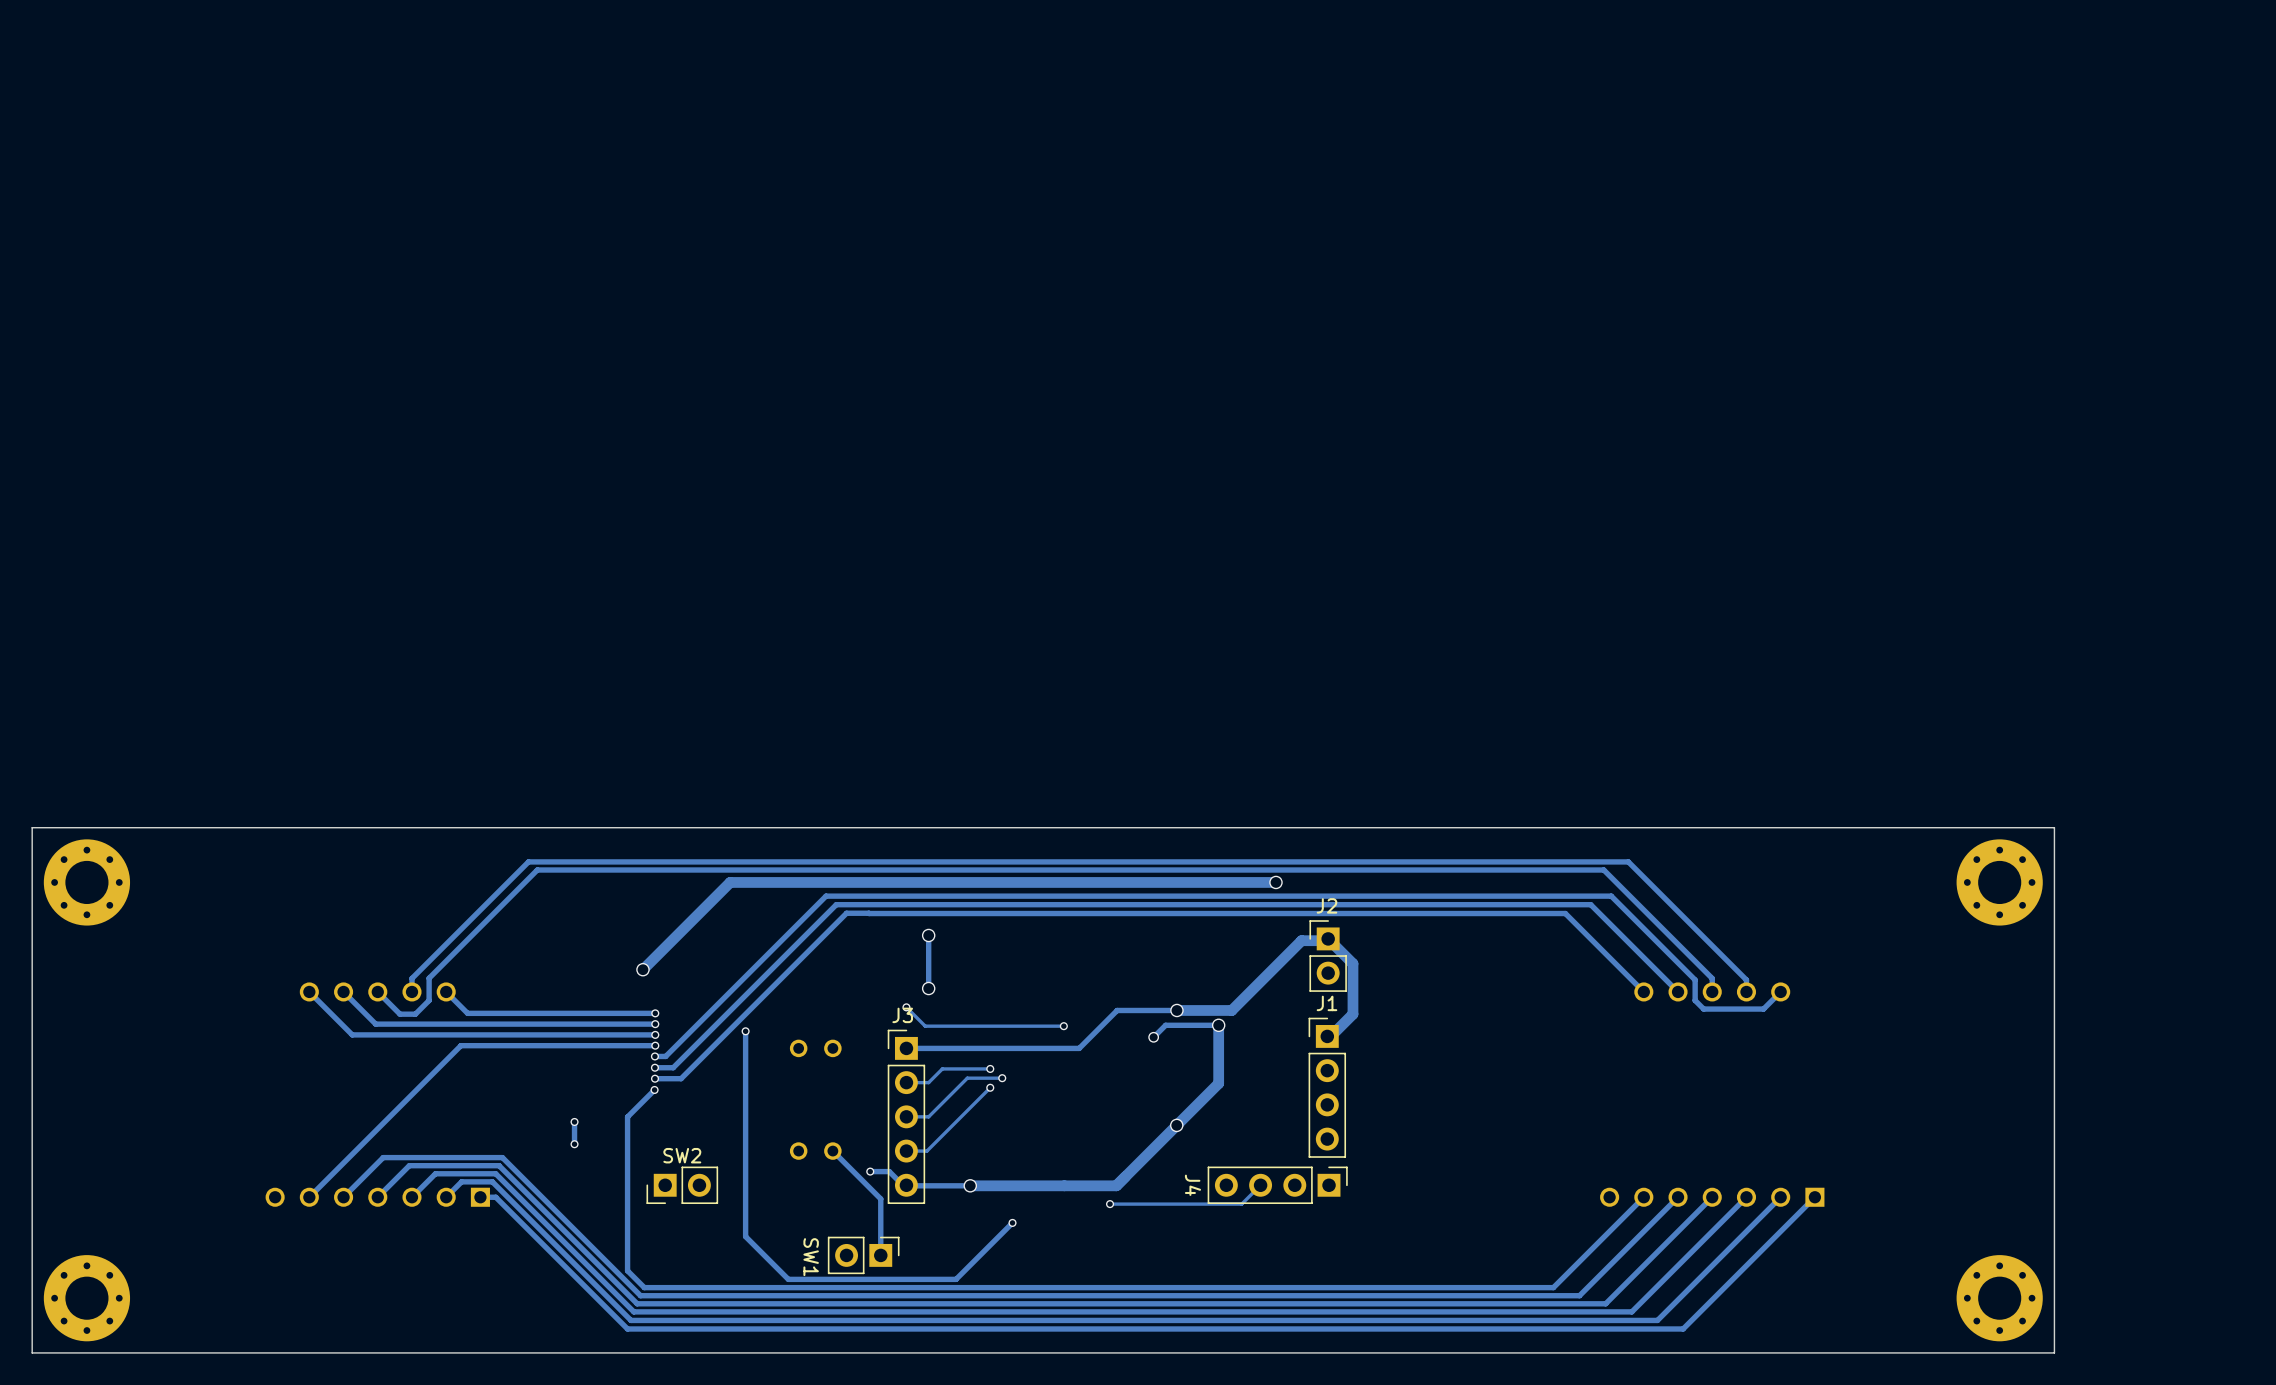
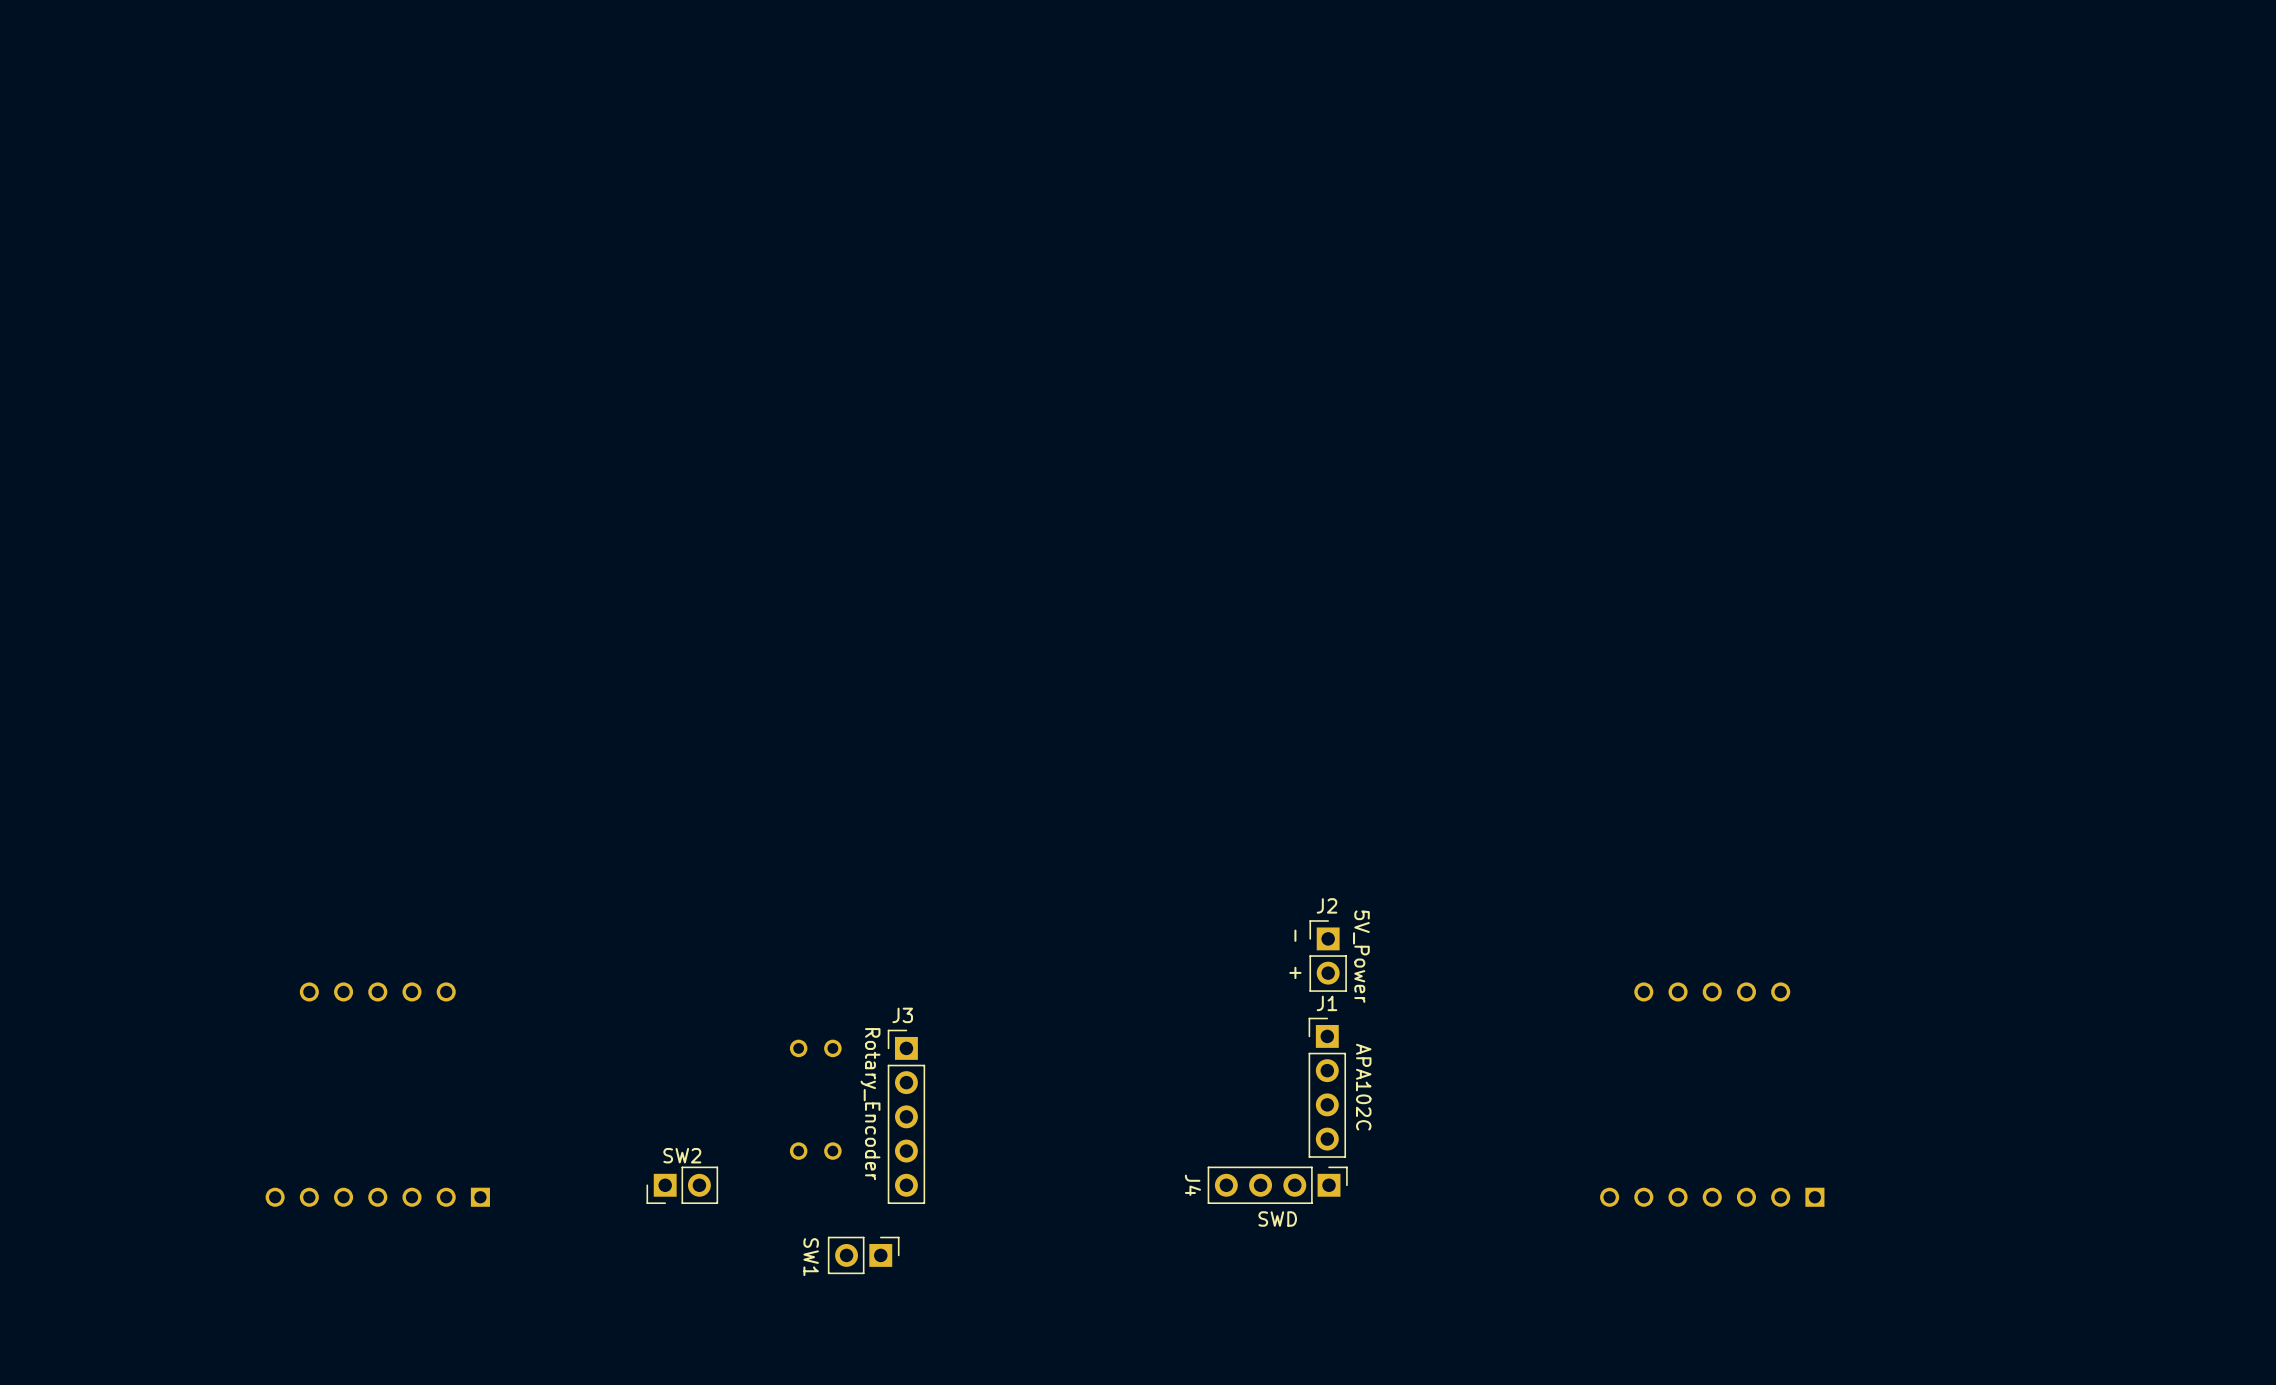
board edge: (2054, 827) (32, 827) (32, 1352) (2054, 1352) (2054, 827) -> none
part: (86, 882) -> none
track: (1275, 882) (730, 882) (642, 969) -> none
via: (1275, 882) -> none
part: (1999, 882) -> none
track: (928, 935) (928, 988) -> none
via: (928, 935) -> none
J2 text: none -> - + (1295, 954)
J2 value: none -> 5V_Power (1361, 956)
via: (642, 969) -> none
via: (928, 988) -> none
track: (309, 991) (352, 1034) (655, 1034) -> none
track: (343, 991) (375, 1024) (655, 1024) -> none
track: (446, 991) (467, 1013) (655, 1013) -> none
track: (1643, 991) (1565, 913) (846, 913) (681, 1078) (655, 1078) -> none
track: (1678, 991) (1590, 904) (836, 904) (673, 1067) (654, 1067) -> none
track: (1712, 991) (1712, 978) (1603, 870) (537, 870) (429, 978) (429, 1000) (415, 1014) (400, 1014) (377, 991) -> none
track: (1746, 991) (1746, 979) (1628, 861) (528, 861) (412, 978) (412, 991) -> none
track: (1780, 991) (1763, 1009) (1703, 1009) (1695, 1000) (1695, 979) (1611, 896) (826, 896) (665, 1056) (654, 1056) -> none
track: (906, 1007) (925, 1026) (1063, 1026) -> none
via: (906, 1007) -> none
via: (1176, 1010) -> none
via: (655, 1013) -> none
via: (655, 1024) -> none
via: (1218, 1025) -> none
via: (1063, 1026) -> none
track: (745, 1031) (745, 1236) (788, 1279) (956, 1279) (1012, 1222) -> none
via: (745, 1031) -> none
via: (655, 1034) -> none
track: (1153, 1037) (1165, 1025) (1218, 1025) (1218, 1083) (1116, 1185) (910, 1185) -> none
via: (1153, 1037) -> none
track: (1327, 1039) (1352, 1014) (1352, 963) (1328, 938) (1326, 940) (1301, 940) (1231, 1010) (1117, 1010) (1079, 1048) (906, 1048) (901, 1053) -> none
track: (655, 1045) (460, 1045) (309, 1197) -> none
via: (655, 1045) -> none
via: (654, 1056) -> none
via: (654, 1067) -> none
track: (990, 1068) (942, 1068) (928, 1082) (906, 1082) (901, 1087) -> none
via: (990, 1068) -> none
via: (655, 1078) -> none
track: (1002, 1078) (967, 1078) (928, 1116) (906, 1116) (901, 1121) -> none
via: (1002, 1078) -> none
track: (990, 1087) (926, 1151) (909, 1151) (904, 1156) (901, 1156) -> none
via: (990, 1087) -> none
J1 value: none -> APA102C (1363, 1087)
track: (654, 1089) (627, 1116) (627, 1270) (644, 1287) (1553, 1287) (1643, 1197) -> none
via: (654, 1089) -> none
J3 value: none -> Rotary_Encoder (870, 1104)
track: (574, 1121) (574, 1144) -> none
via: (574, 1121) -> none
via: (1176, 1125) -> none
via: (574, 1144) -> none
track: (832, 1151) (880, 1198) (880, 1250) (882, 1252) -> none
track: (870, 1171) (889, 1171) (904, 1186) -> none
via: (870, 1171) -> none
via: (970, 1185) -> none
track: (1260, 1185) (1241, 1204) (1110, 1204) -> none
track: (1678, 1197) (1579, 1295) (640, 1295) (502, 1157) (383, 1157) (343, 1197) -> none
track: (1712, 1197) (1605, 1303) (637, 1303) (499, 1165) (409, 1165) (377, 1197) -> none
track: (1746, 1197) (1631, 1311) (633, 1311) (495, 1173) (435, 1173) (412, 1197) -> none
track: (1780, 1197) (1657, 1320) (630, 1320) (492, 1181) (461, 1181) (446, 1197) -> none
track: (1814, 1197) (1683, 1328) (627, 1328) (495, 1197) (480, 1197) -> none
via: (1110, 1204) -> none
J4 value: none -> SWD (1277, 1218)
via: (1012, 1222) -> none
part: (86, 1298) -> none
part: (1999, 1298) -> none

